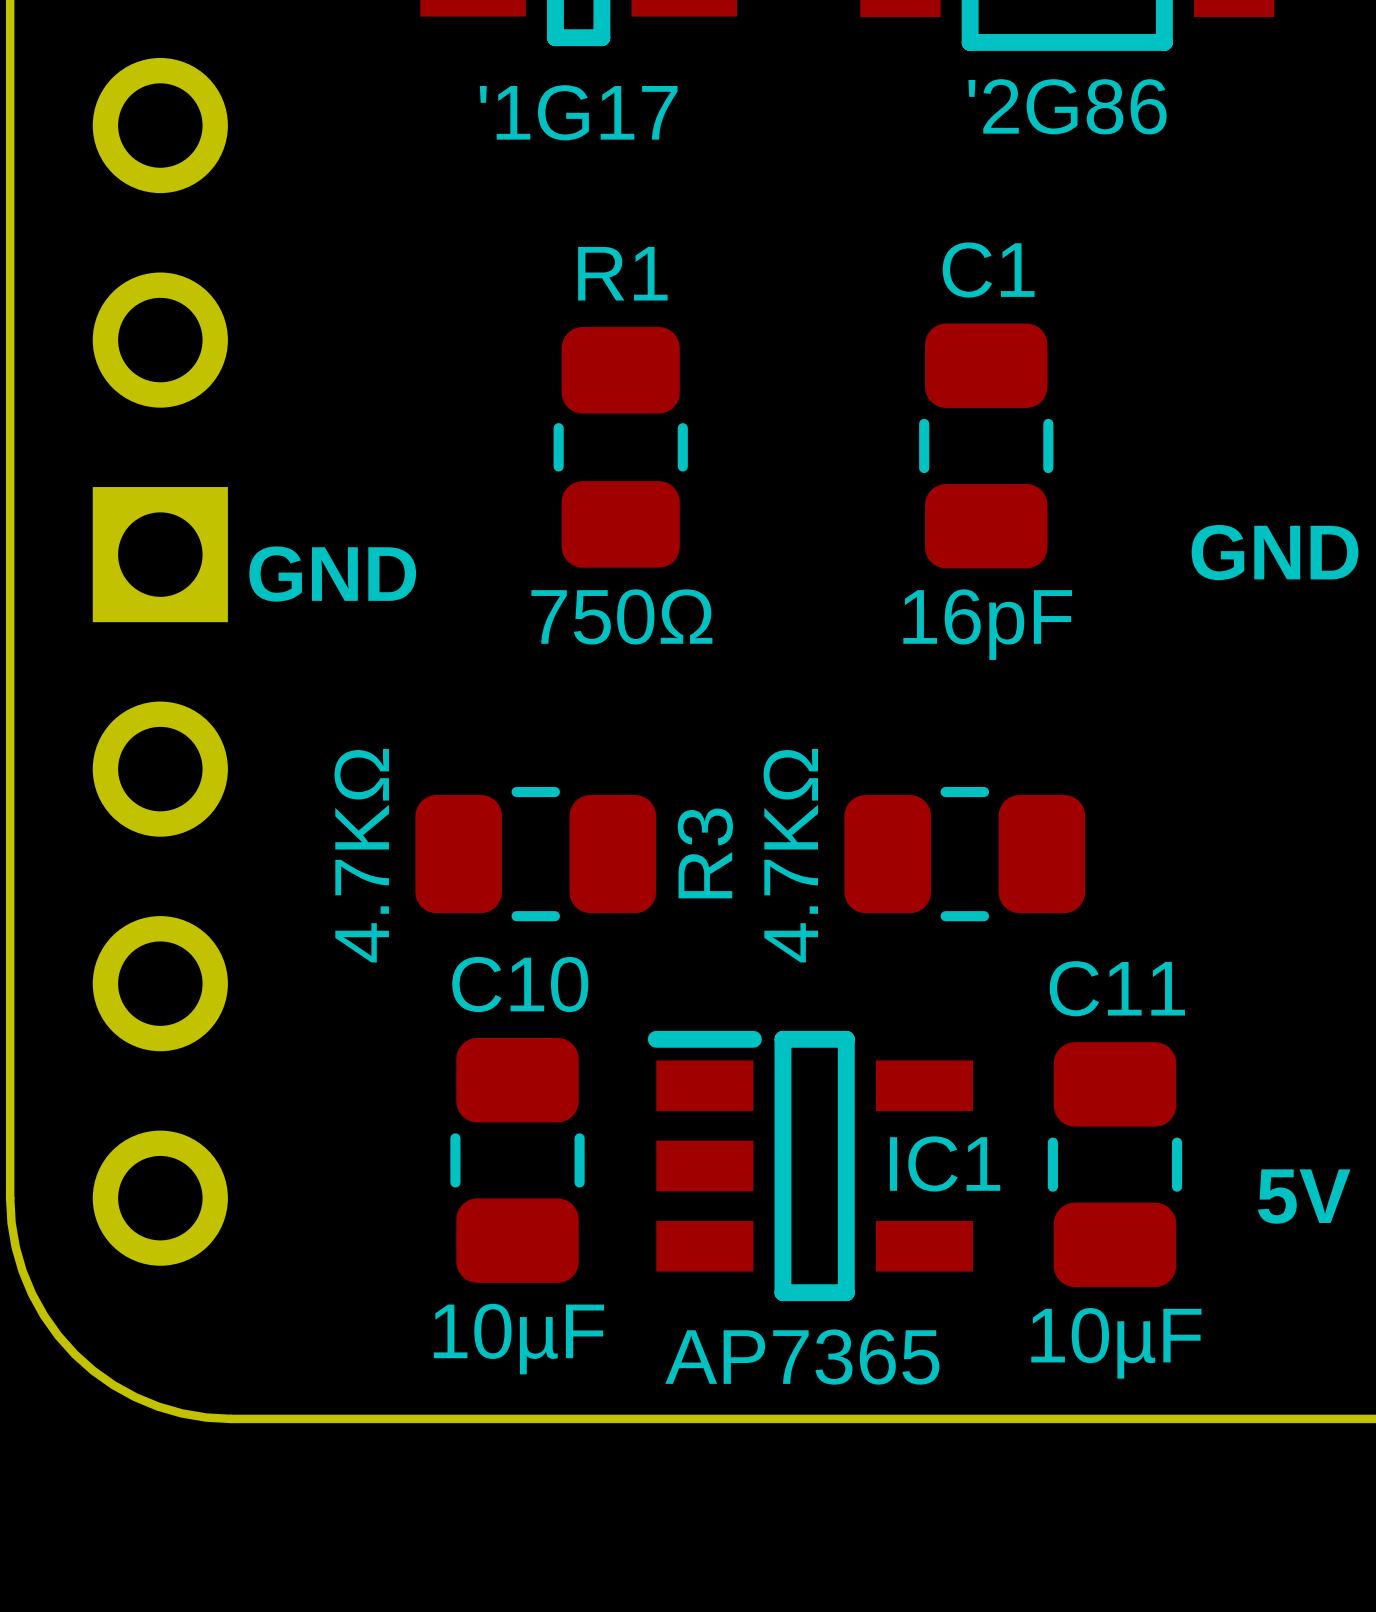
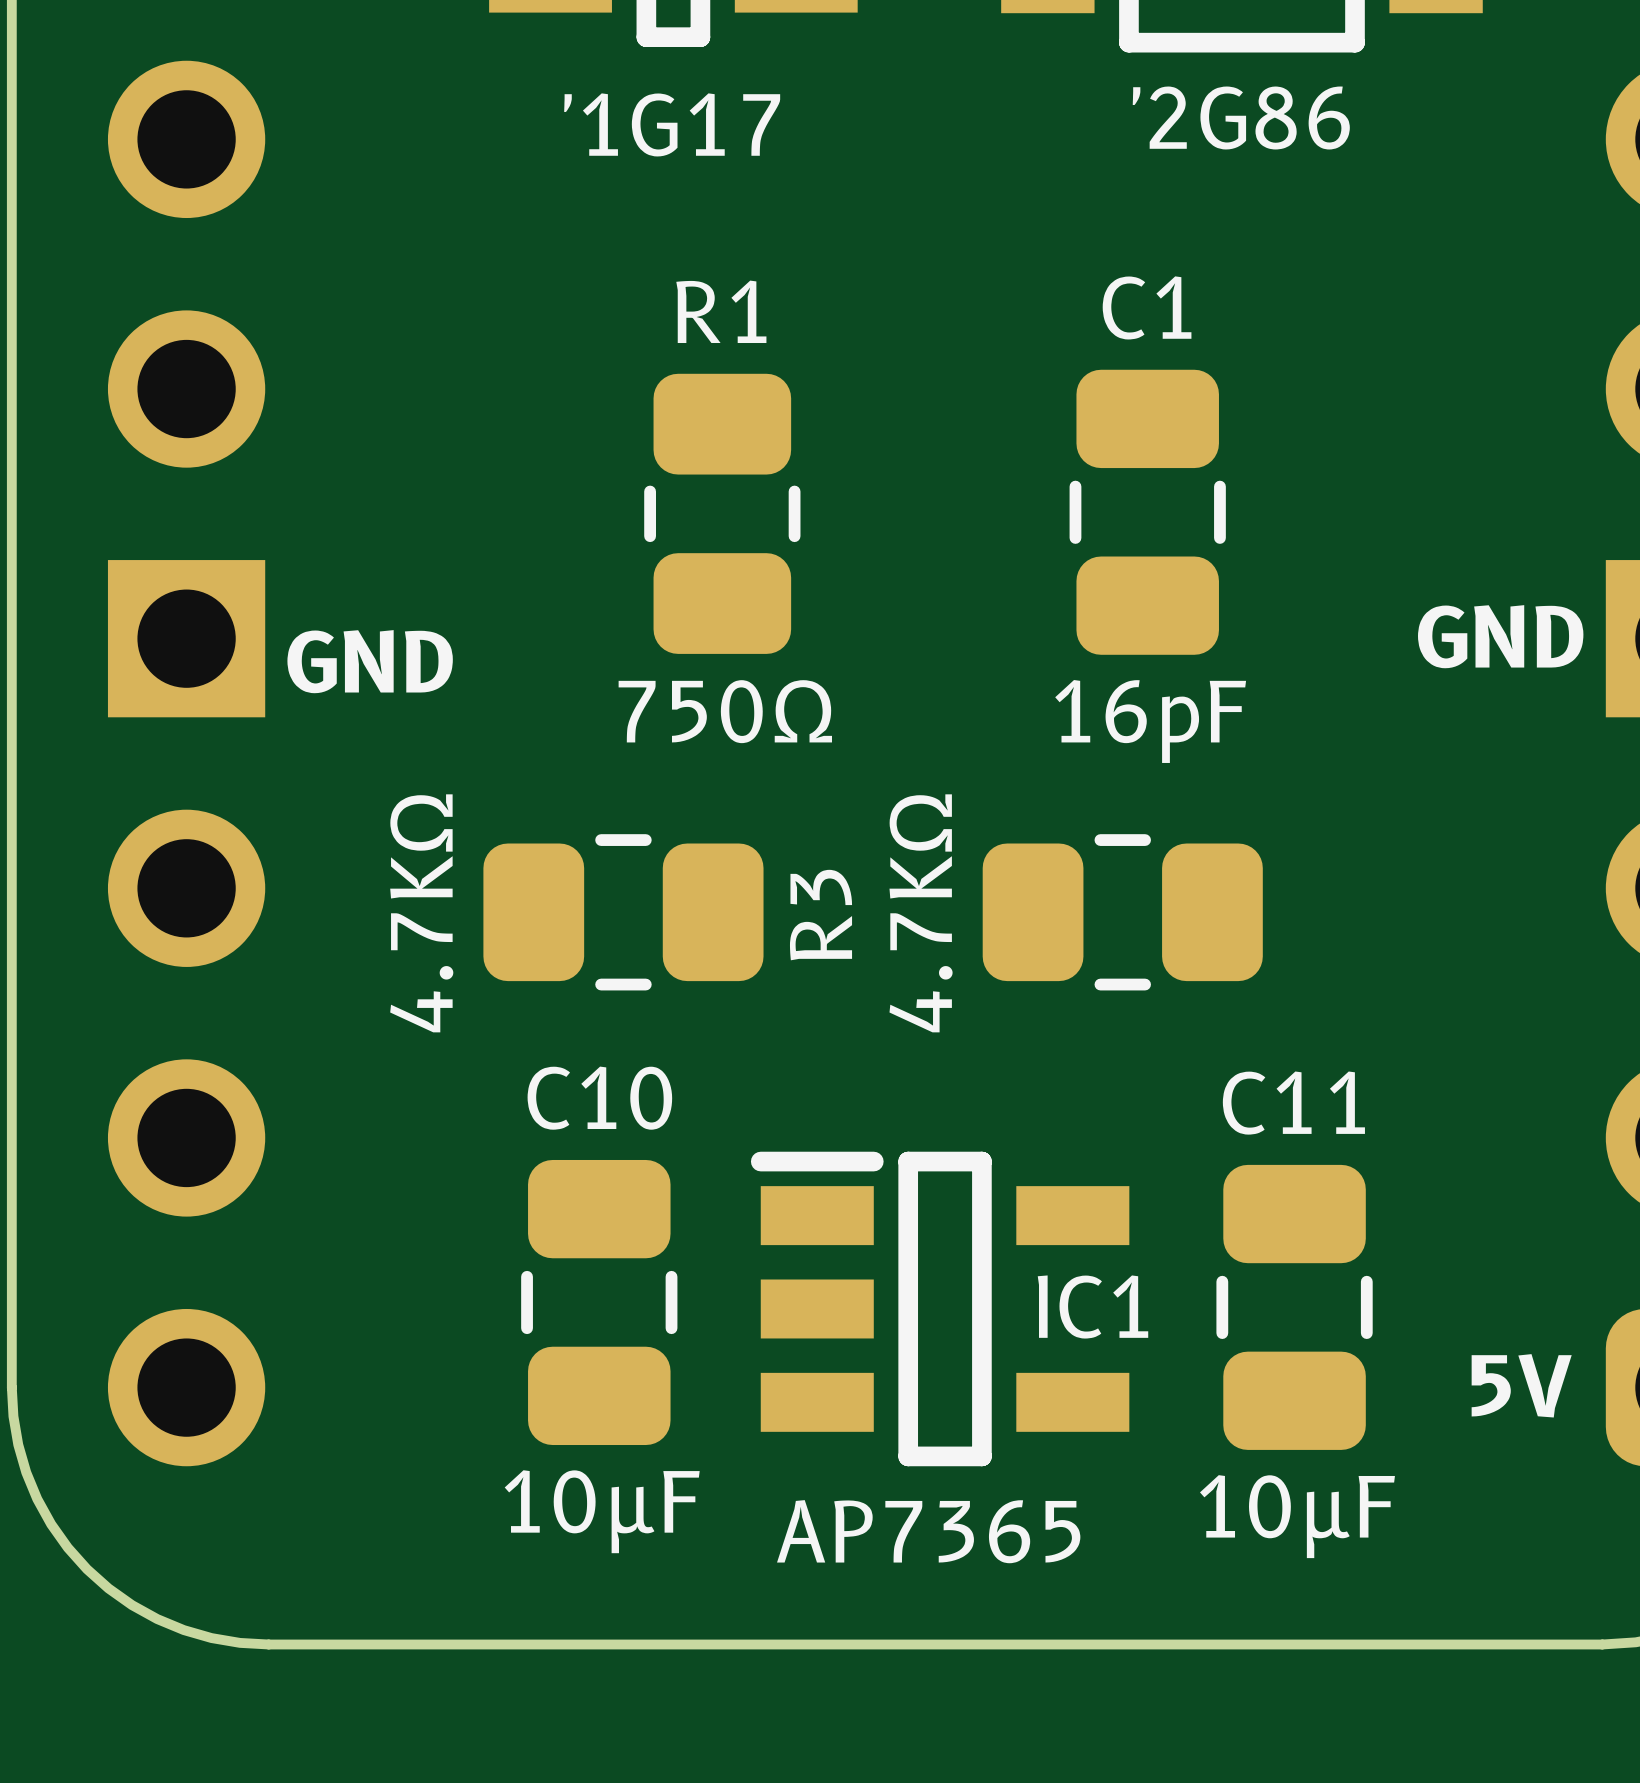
R3 position: (535, 854) -> (623, 912)
part position: (964, 854) -> (1122, 912)
C10 position: (517, 1160) -> (599, 1302)
C11 position: (1114, 1164) -> (1294, 1307)
IC1 position: (810, 1166) -> (940, 1308)

